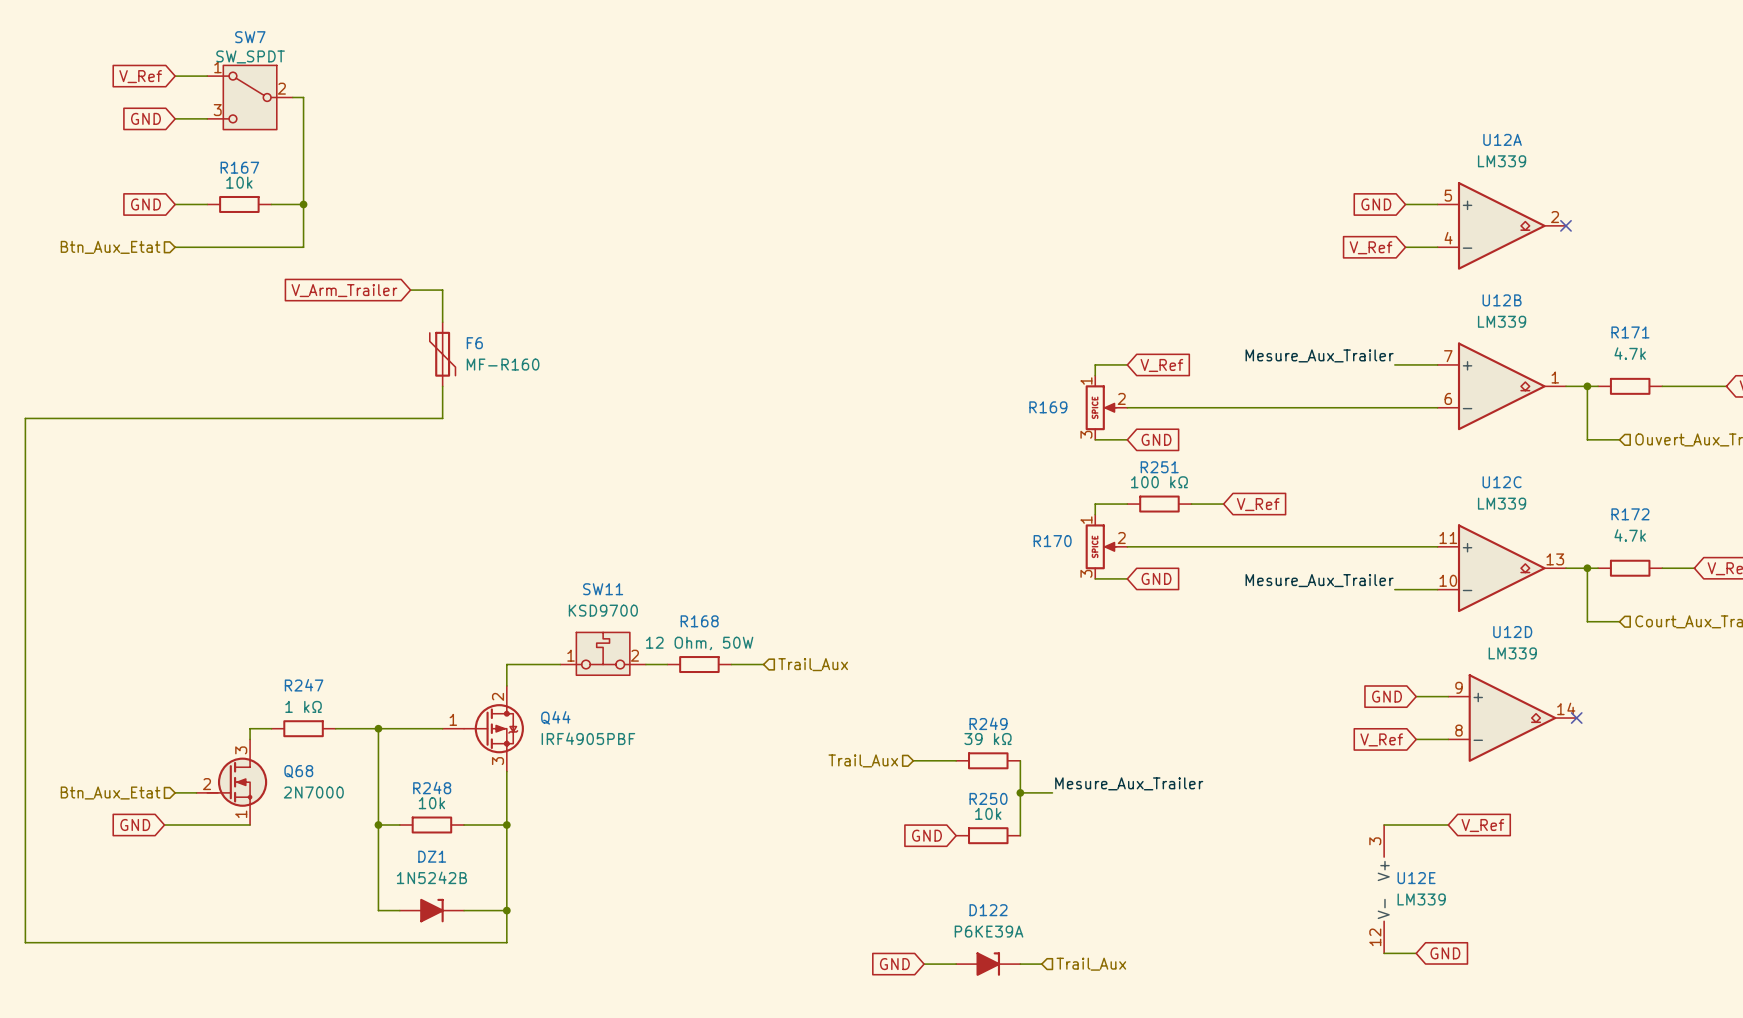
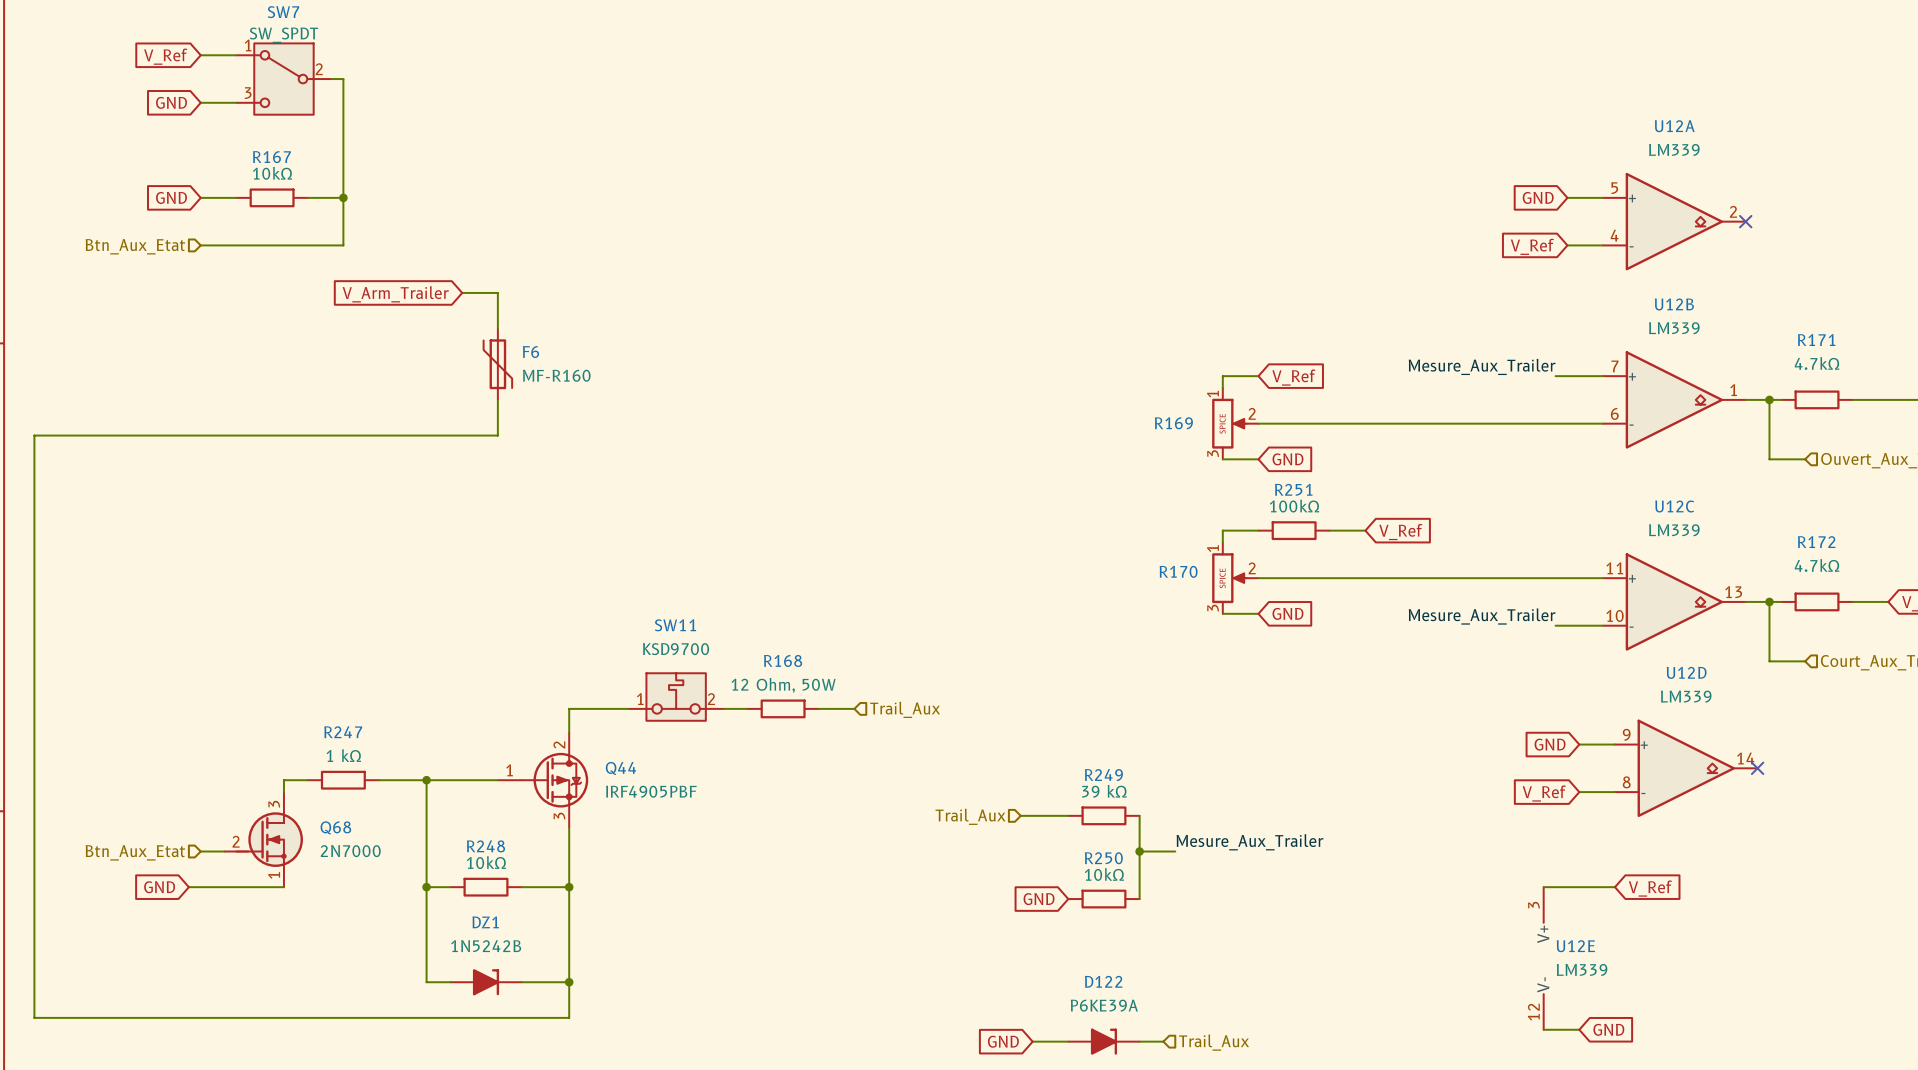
R167 value: 10k (239, 182) -> 10kΩ (272, 173)
R171 value: 4.7k (1630, 353) -> 4.7kΩ (1817, 363)
R251 value: 100 kΩ (1159, 482) -> 100kΩ (1294, 506)
R172 value: 4.7k (1630, 535) -> 4.7kΩ (1817, 565)
R248 value: 10k (431, 803) -> 10kΩ (486, 862)
R250 value: 10k (988, 813) -> 10kΩ (1104, 874)

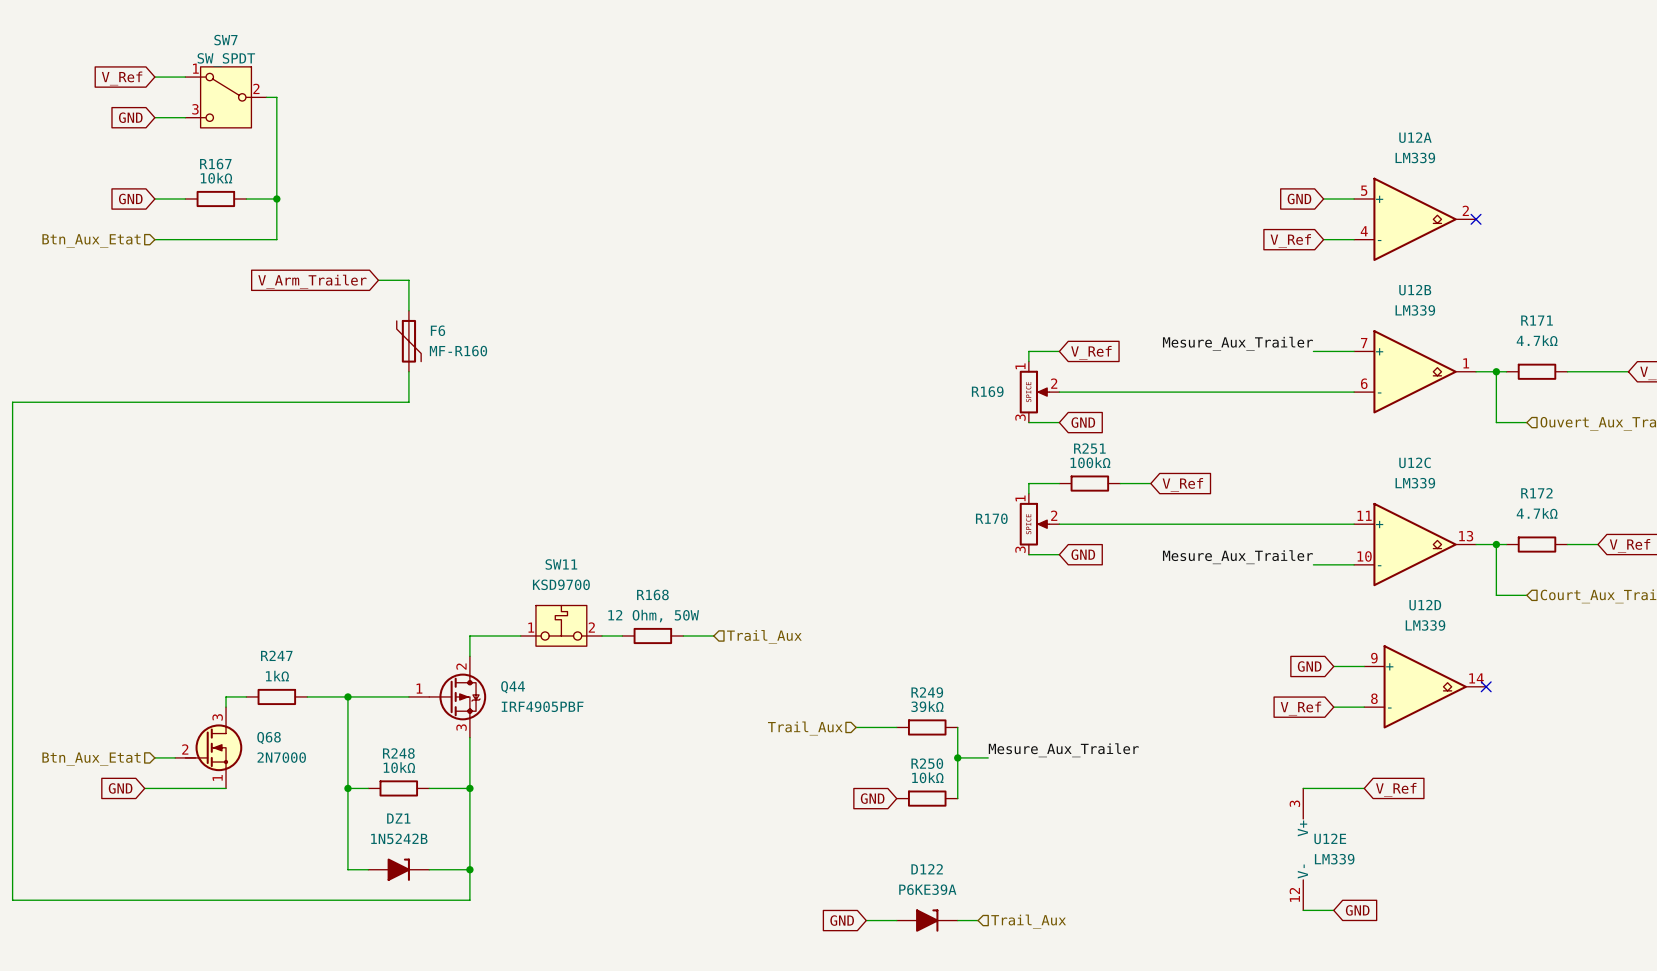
R247 value: 1 kΩ (343, 755) -> 1kΩ (277, 676)
R249 value: 39 kΩ (1104, 791) -> 39kΩ (927, 706)

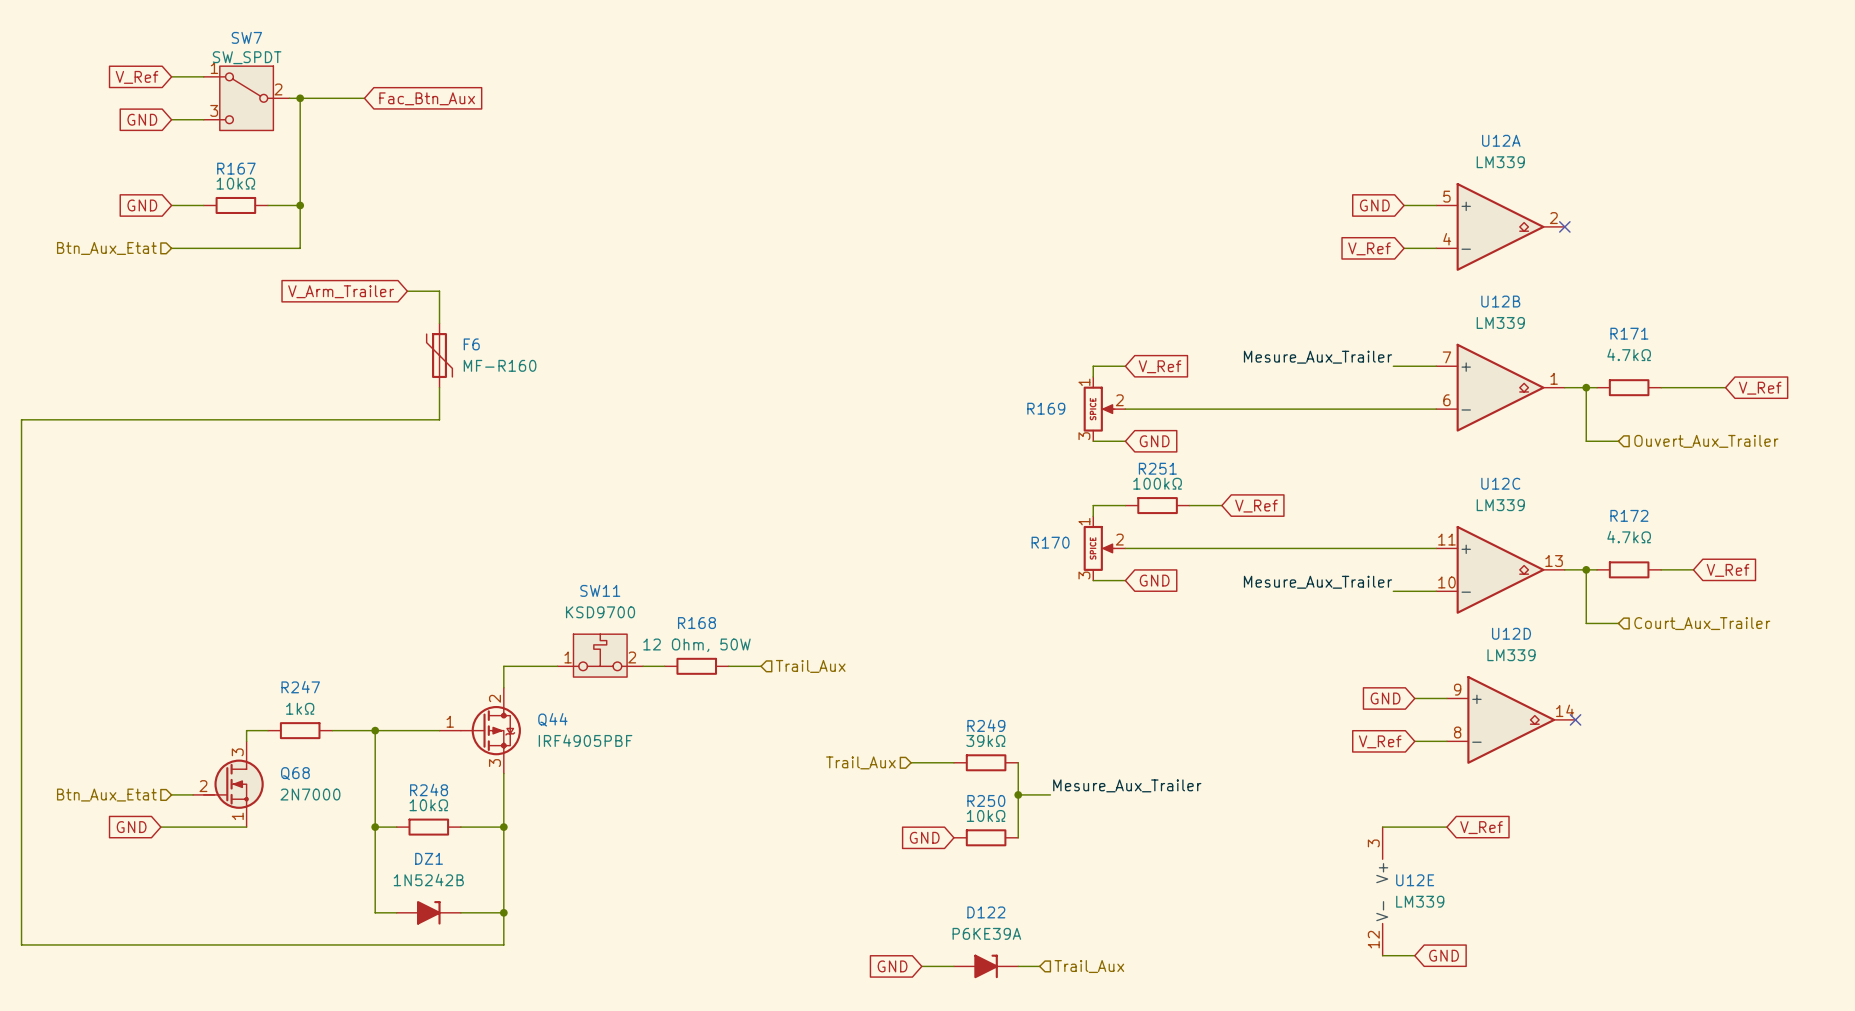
wire: none -> (300, 98) (364, 98)
junction: none -> (300, 98)
global label: none -> Fac_Btn_Aux (427, 98)

